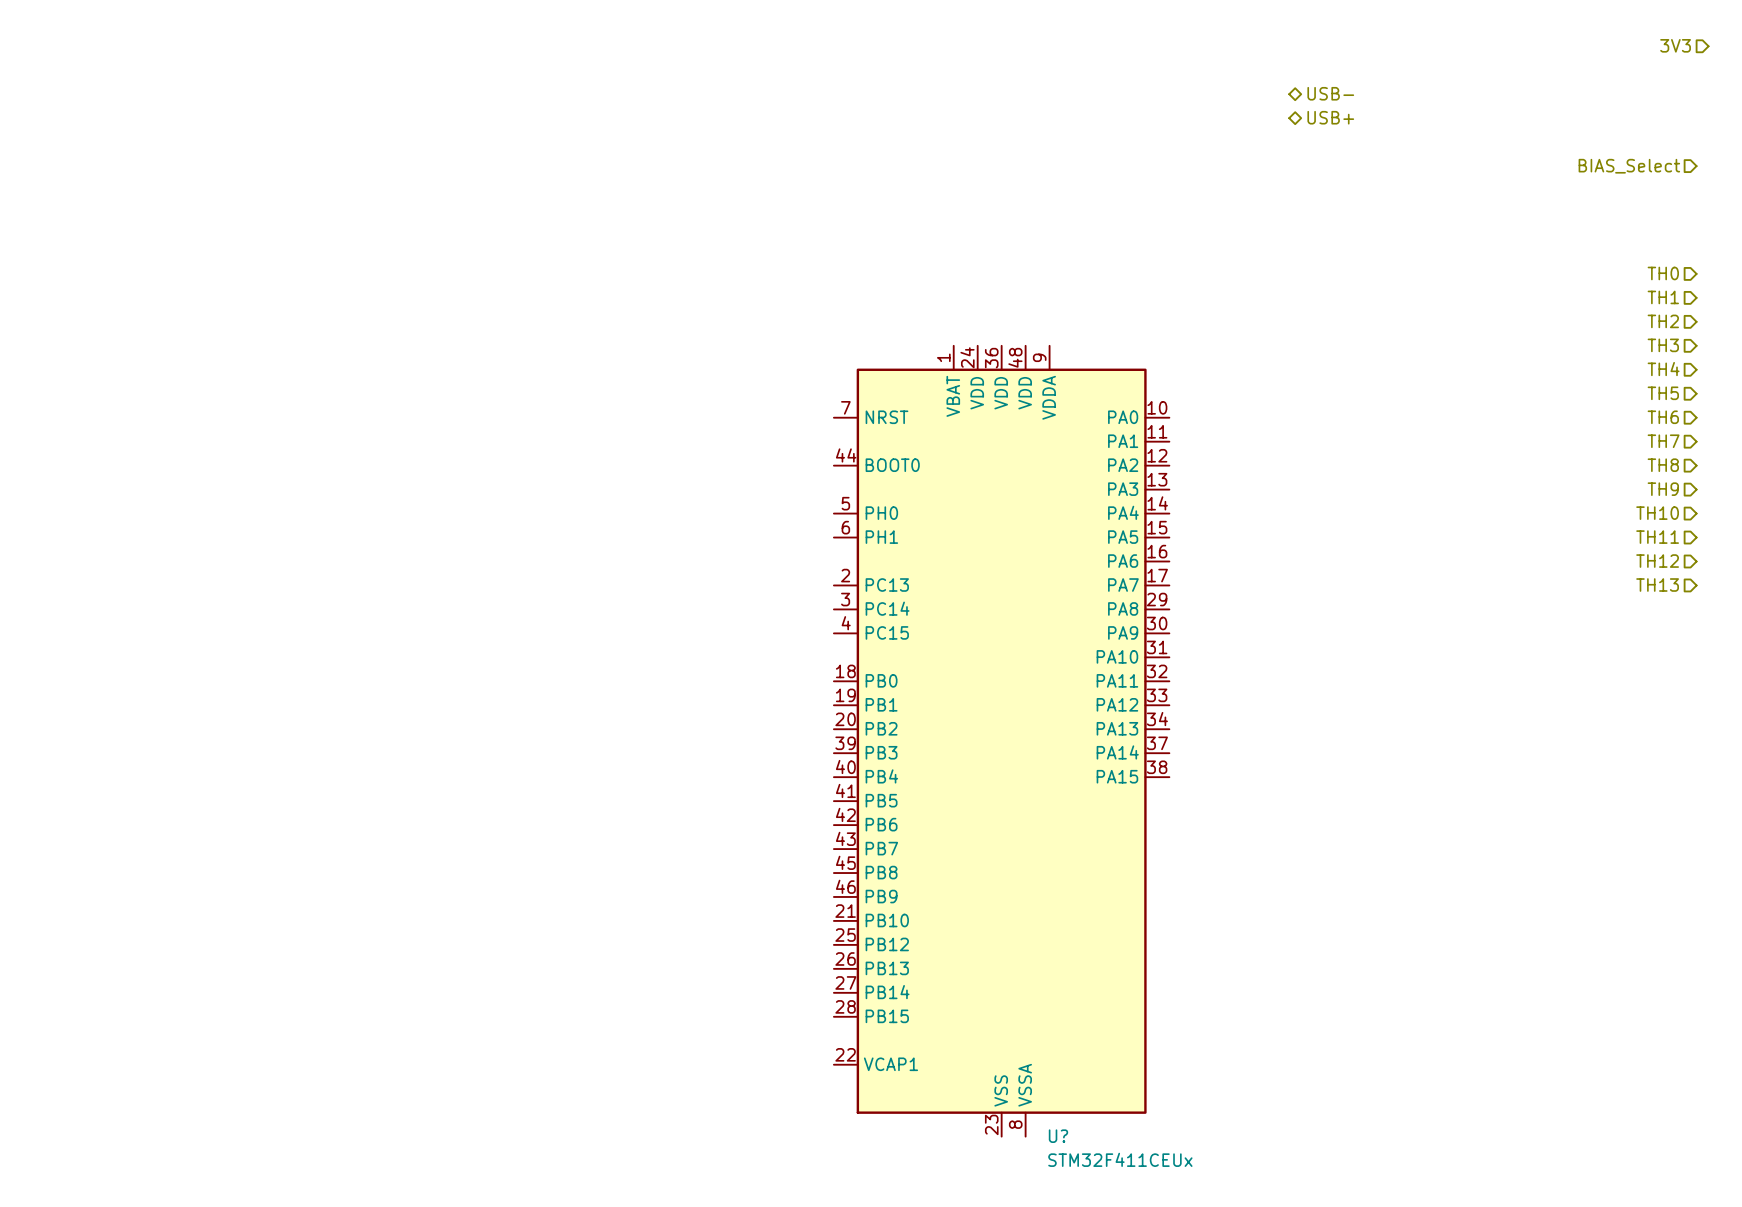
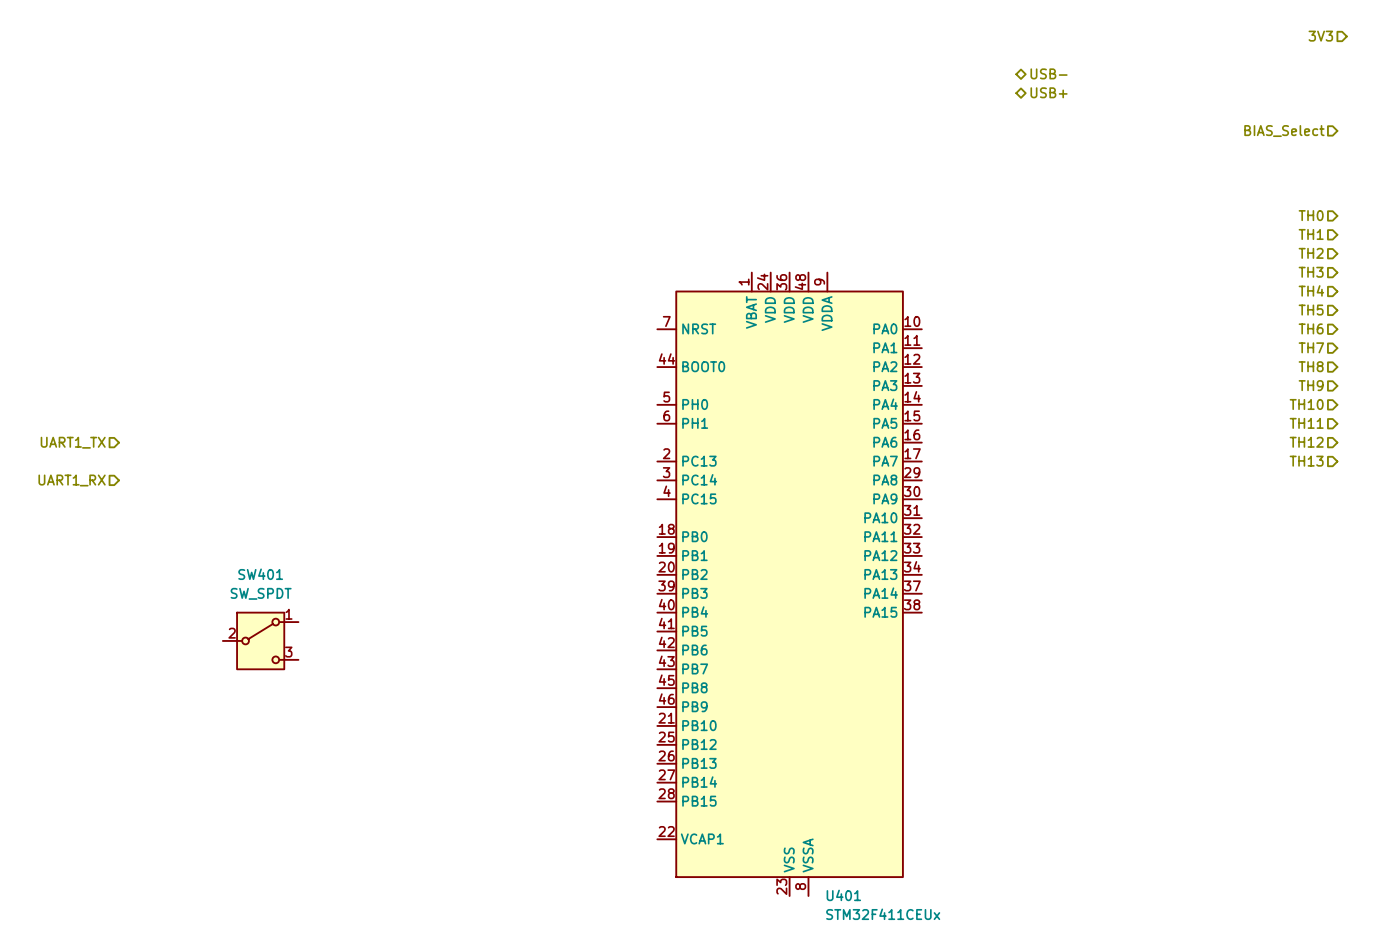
hierarchical label: none -> UART1_TX (73, 442)
hierarchical label: none -> UART1_RX (72, 480)
SW401: none -> SW_SPDT (260, 640)
U? name: U? (1058, 1136) -> U401 (843, 895)

